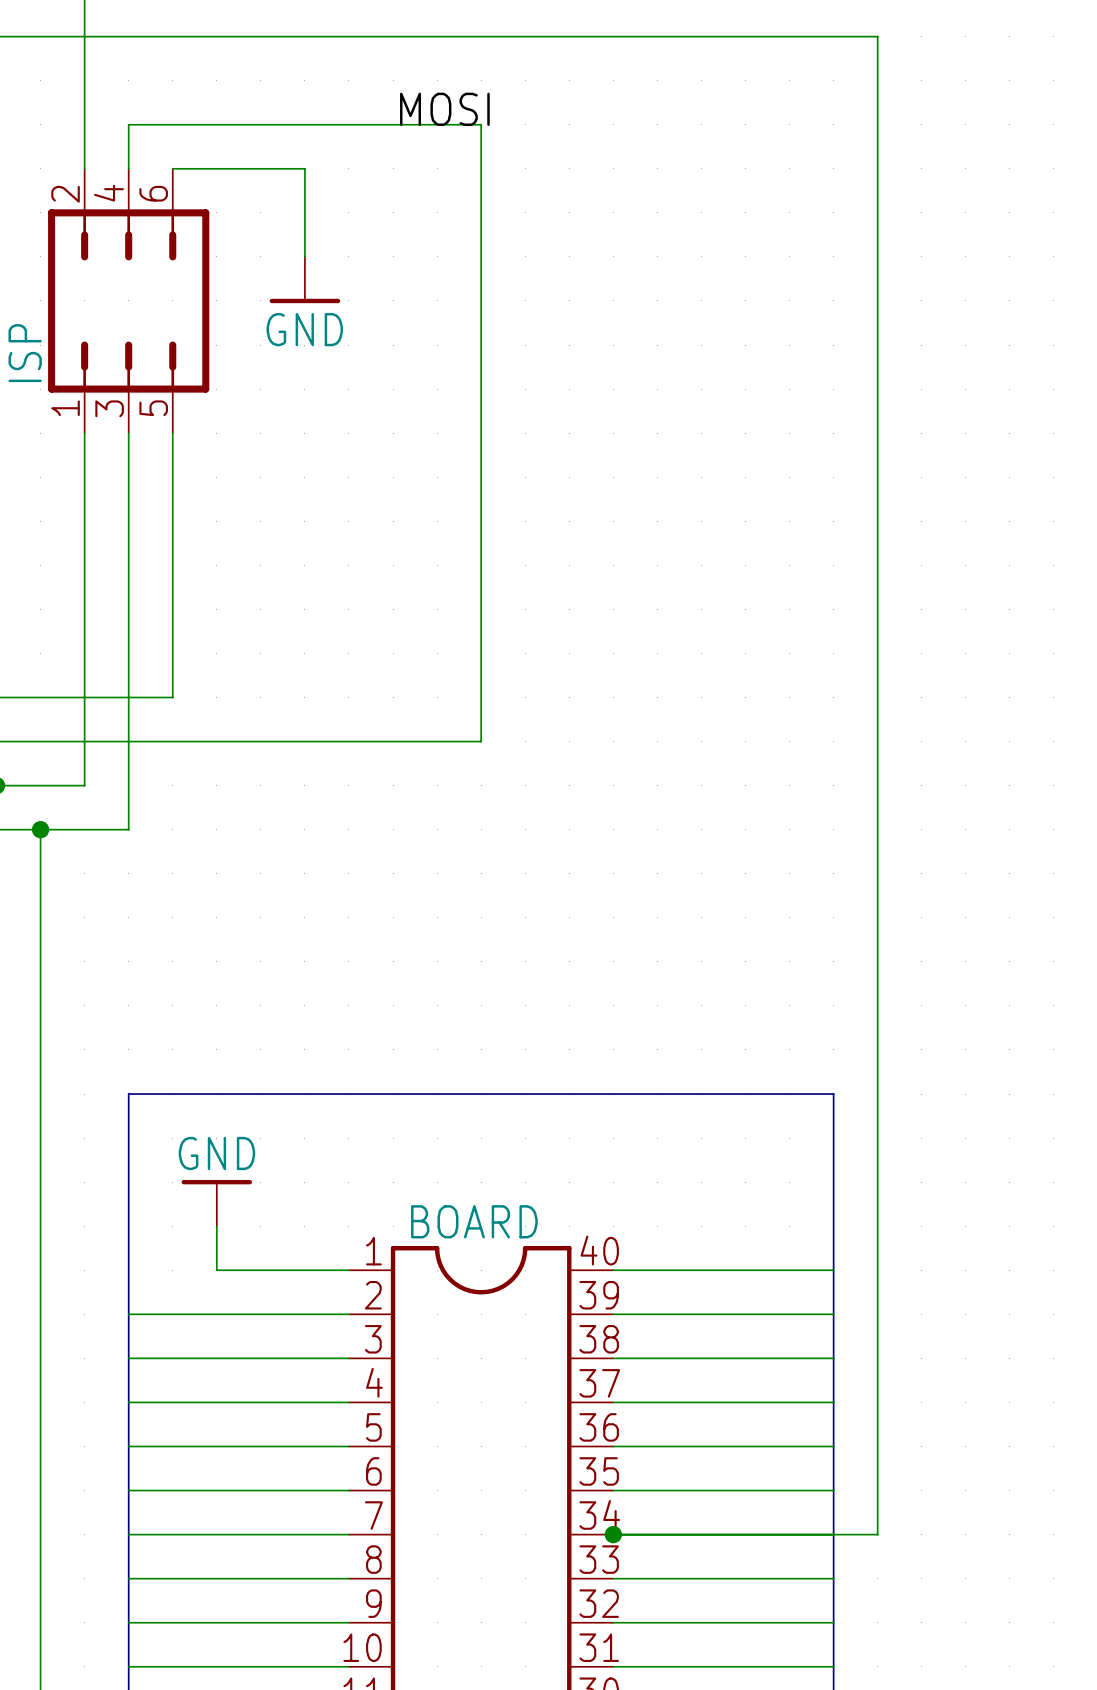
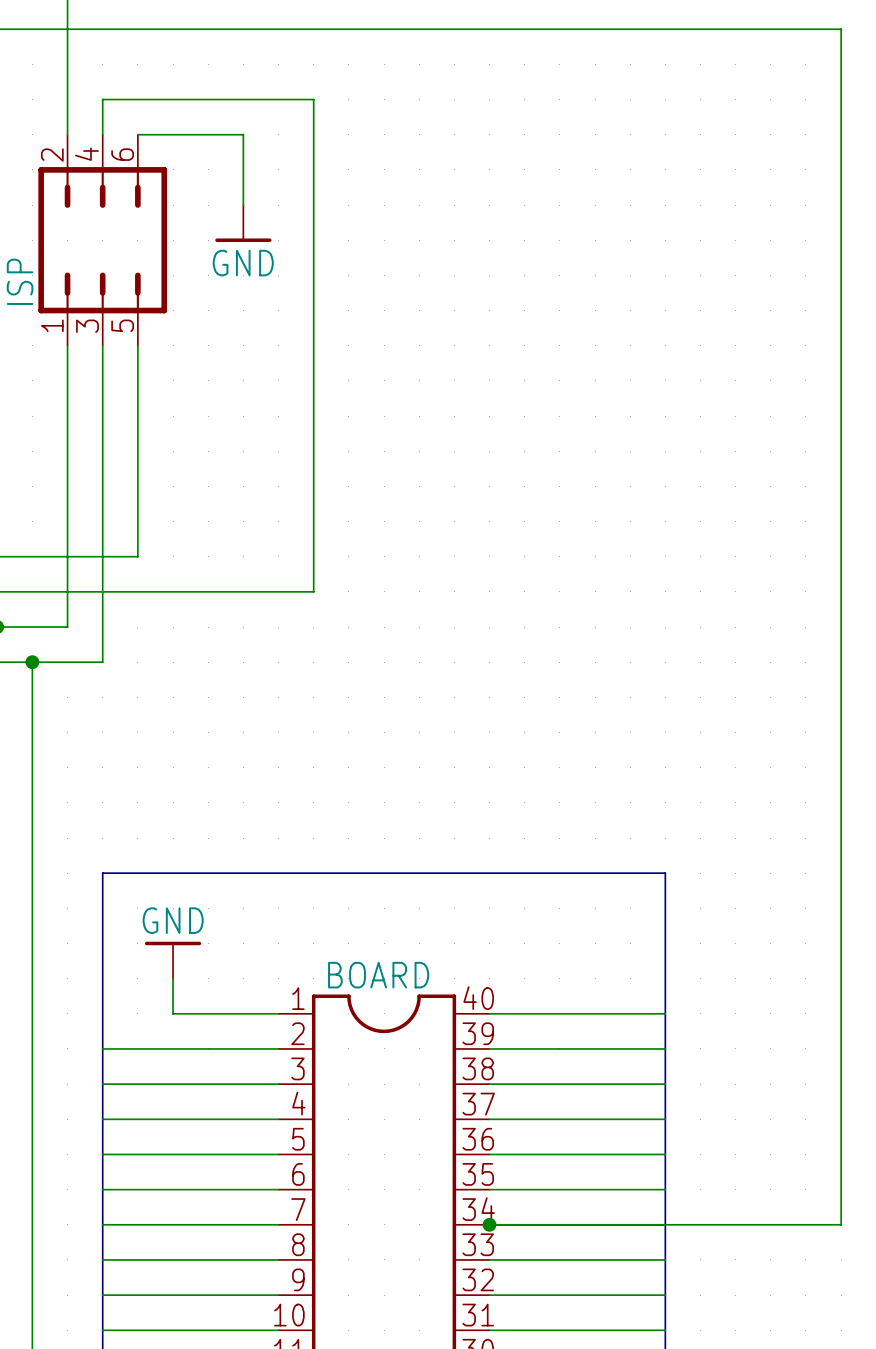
wire: (877, 36) (877, 1534) -> (700, 29) (841, 29) (841, 1224) (700, 1224)
label: MOSI (444, 109) -> none
wire: (393, 124) (481, 124) (481, 741) (393, 741) -> (313, 99) (313, 591)

